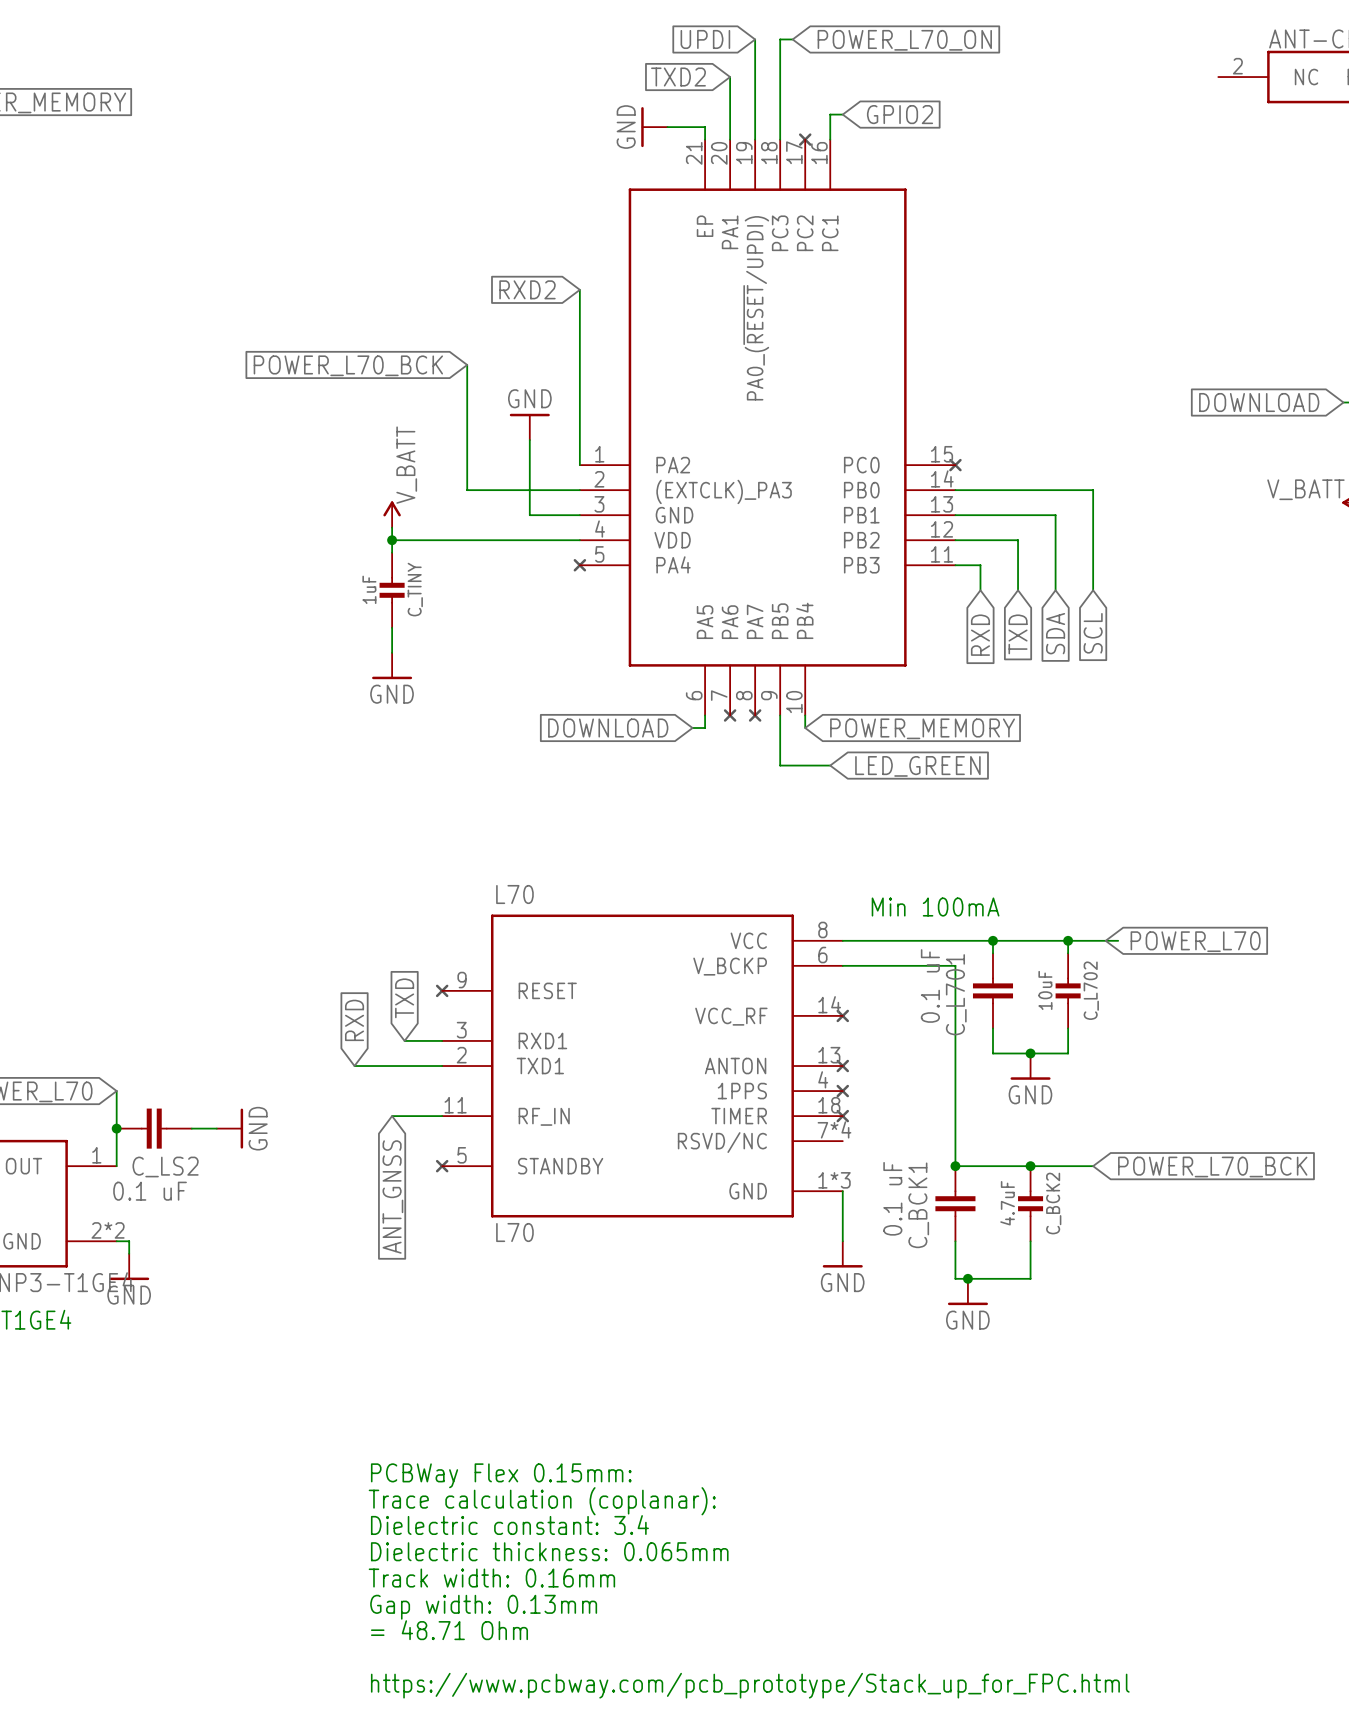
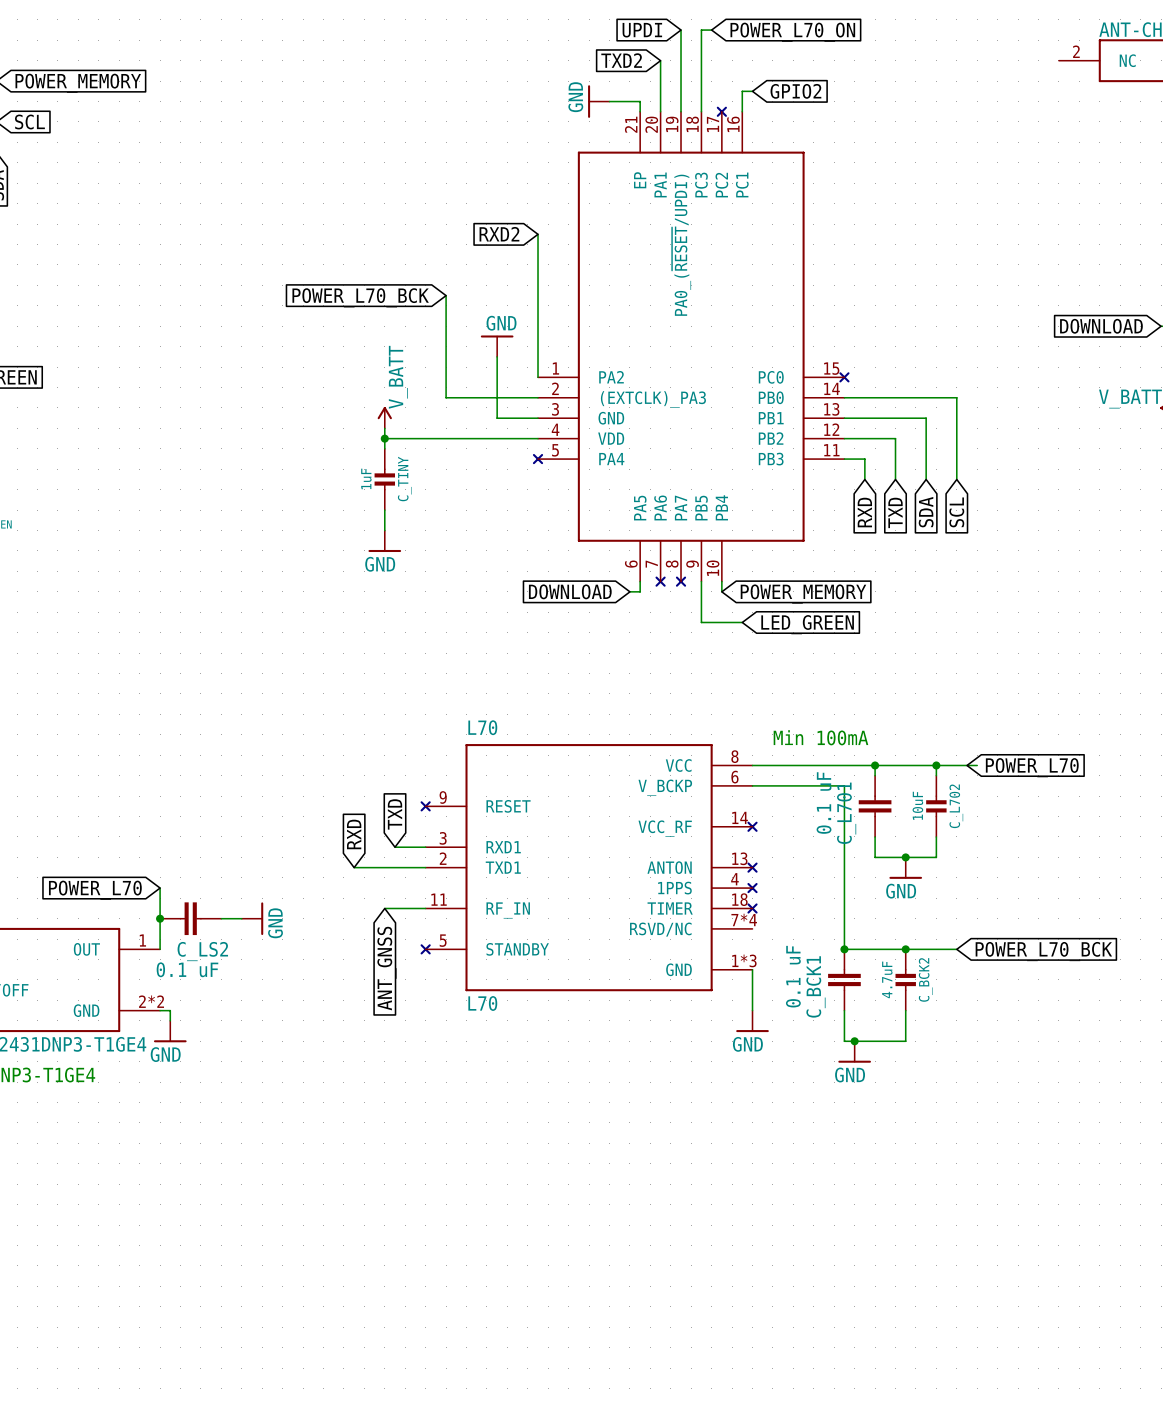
text: PCBWay Flex 0.15mm: (501, 1475) -> none
text: Trace calculation (coplanar): (542, 1501) -> none
text: Dielectric constant: 3.4 (509, 1525) -> none
text: Dielectric thickness: 0.065mm (549, 1551) -> none
text: Track width: 0.16mm (491, 1578) -> none
text: Gap width: 0.13mm (483, 1607) -> none
text: = 48.71 Ohm (449, 1630) -> none
text: https://www.pcbway.com/pcb_prototype/Stack_up_for_FPC.html (750, 1685) -> none

